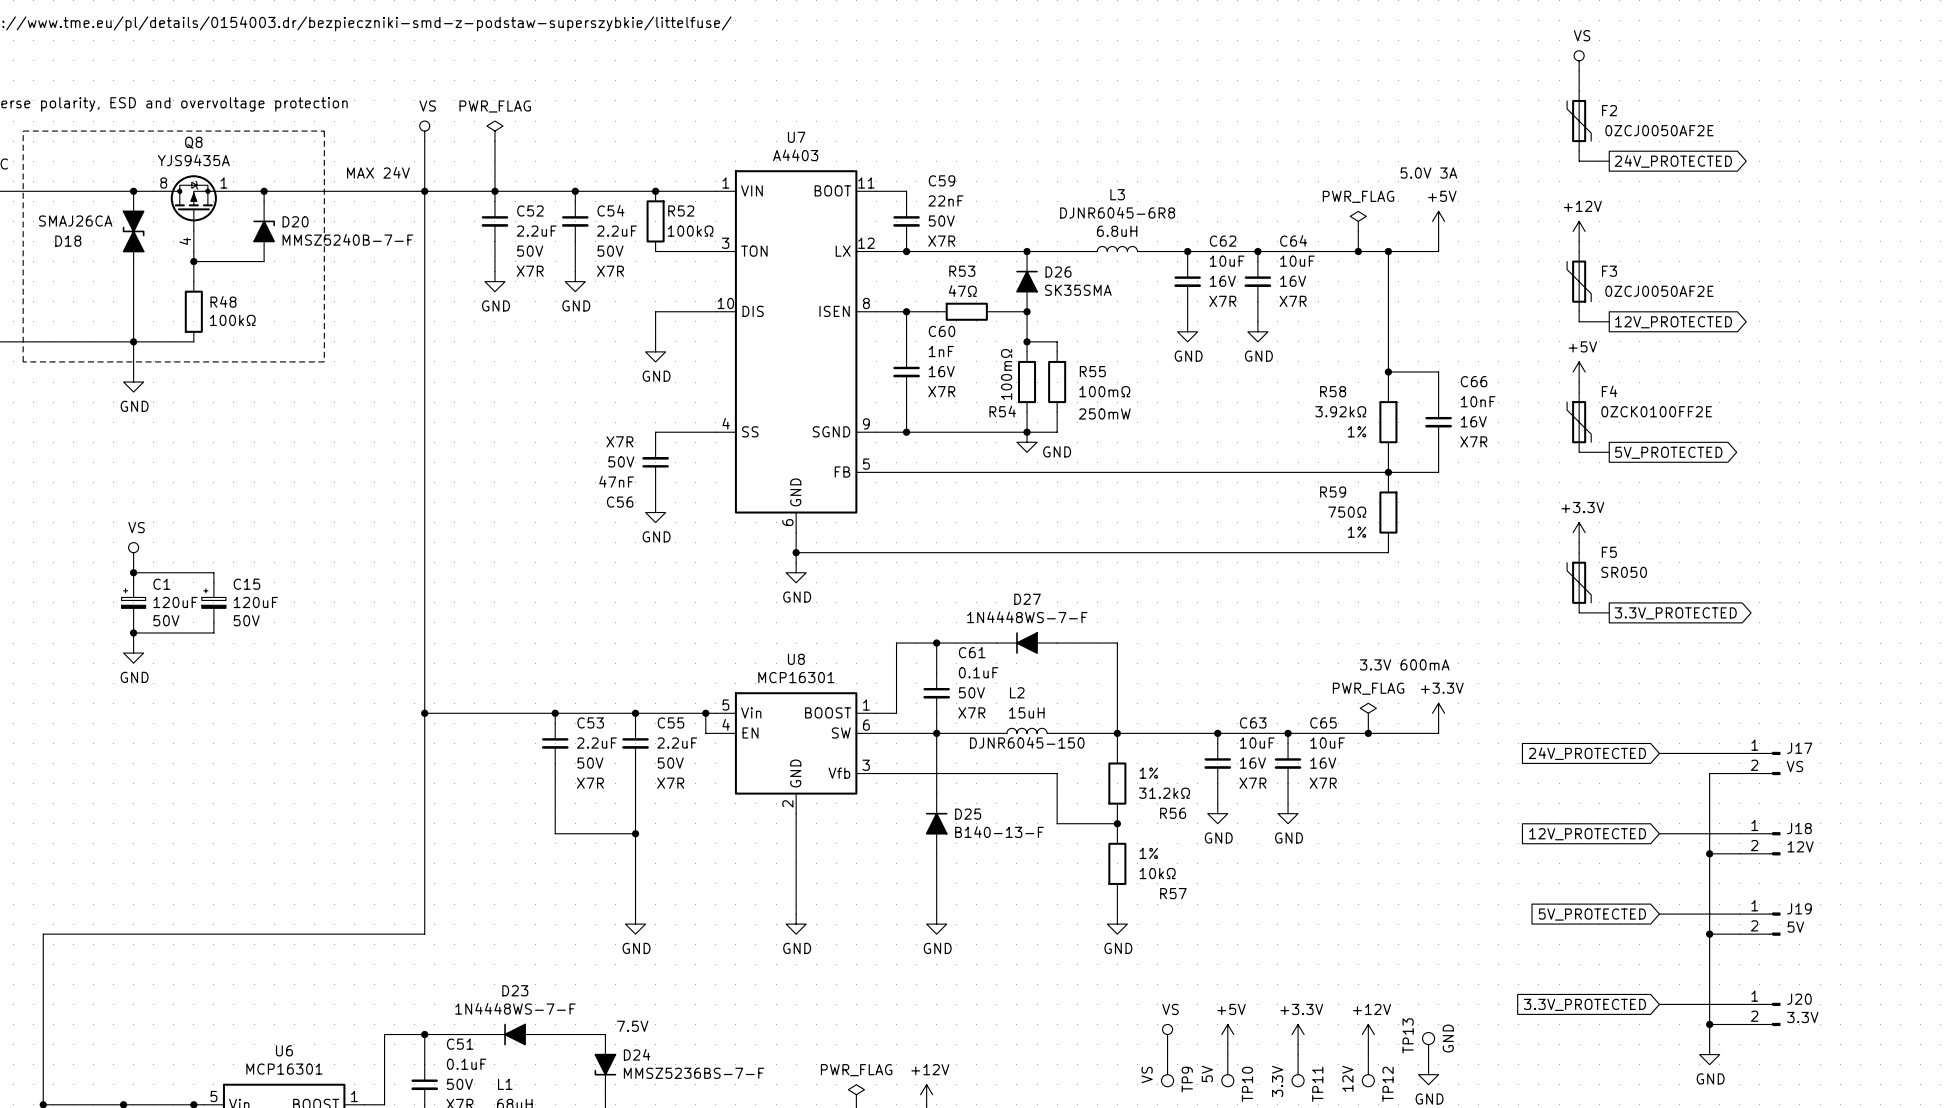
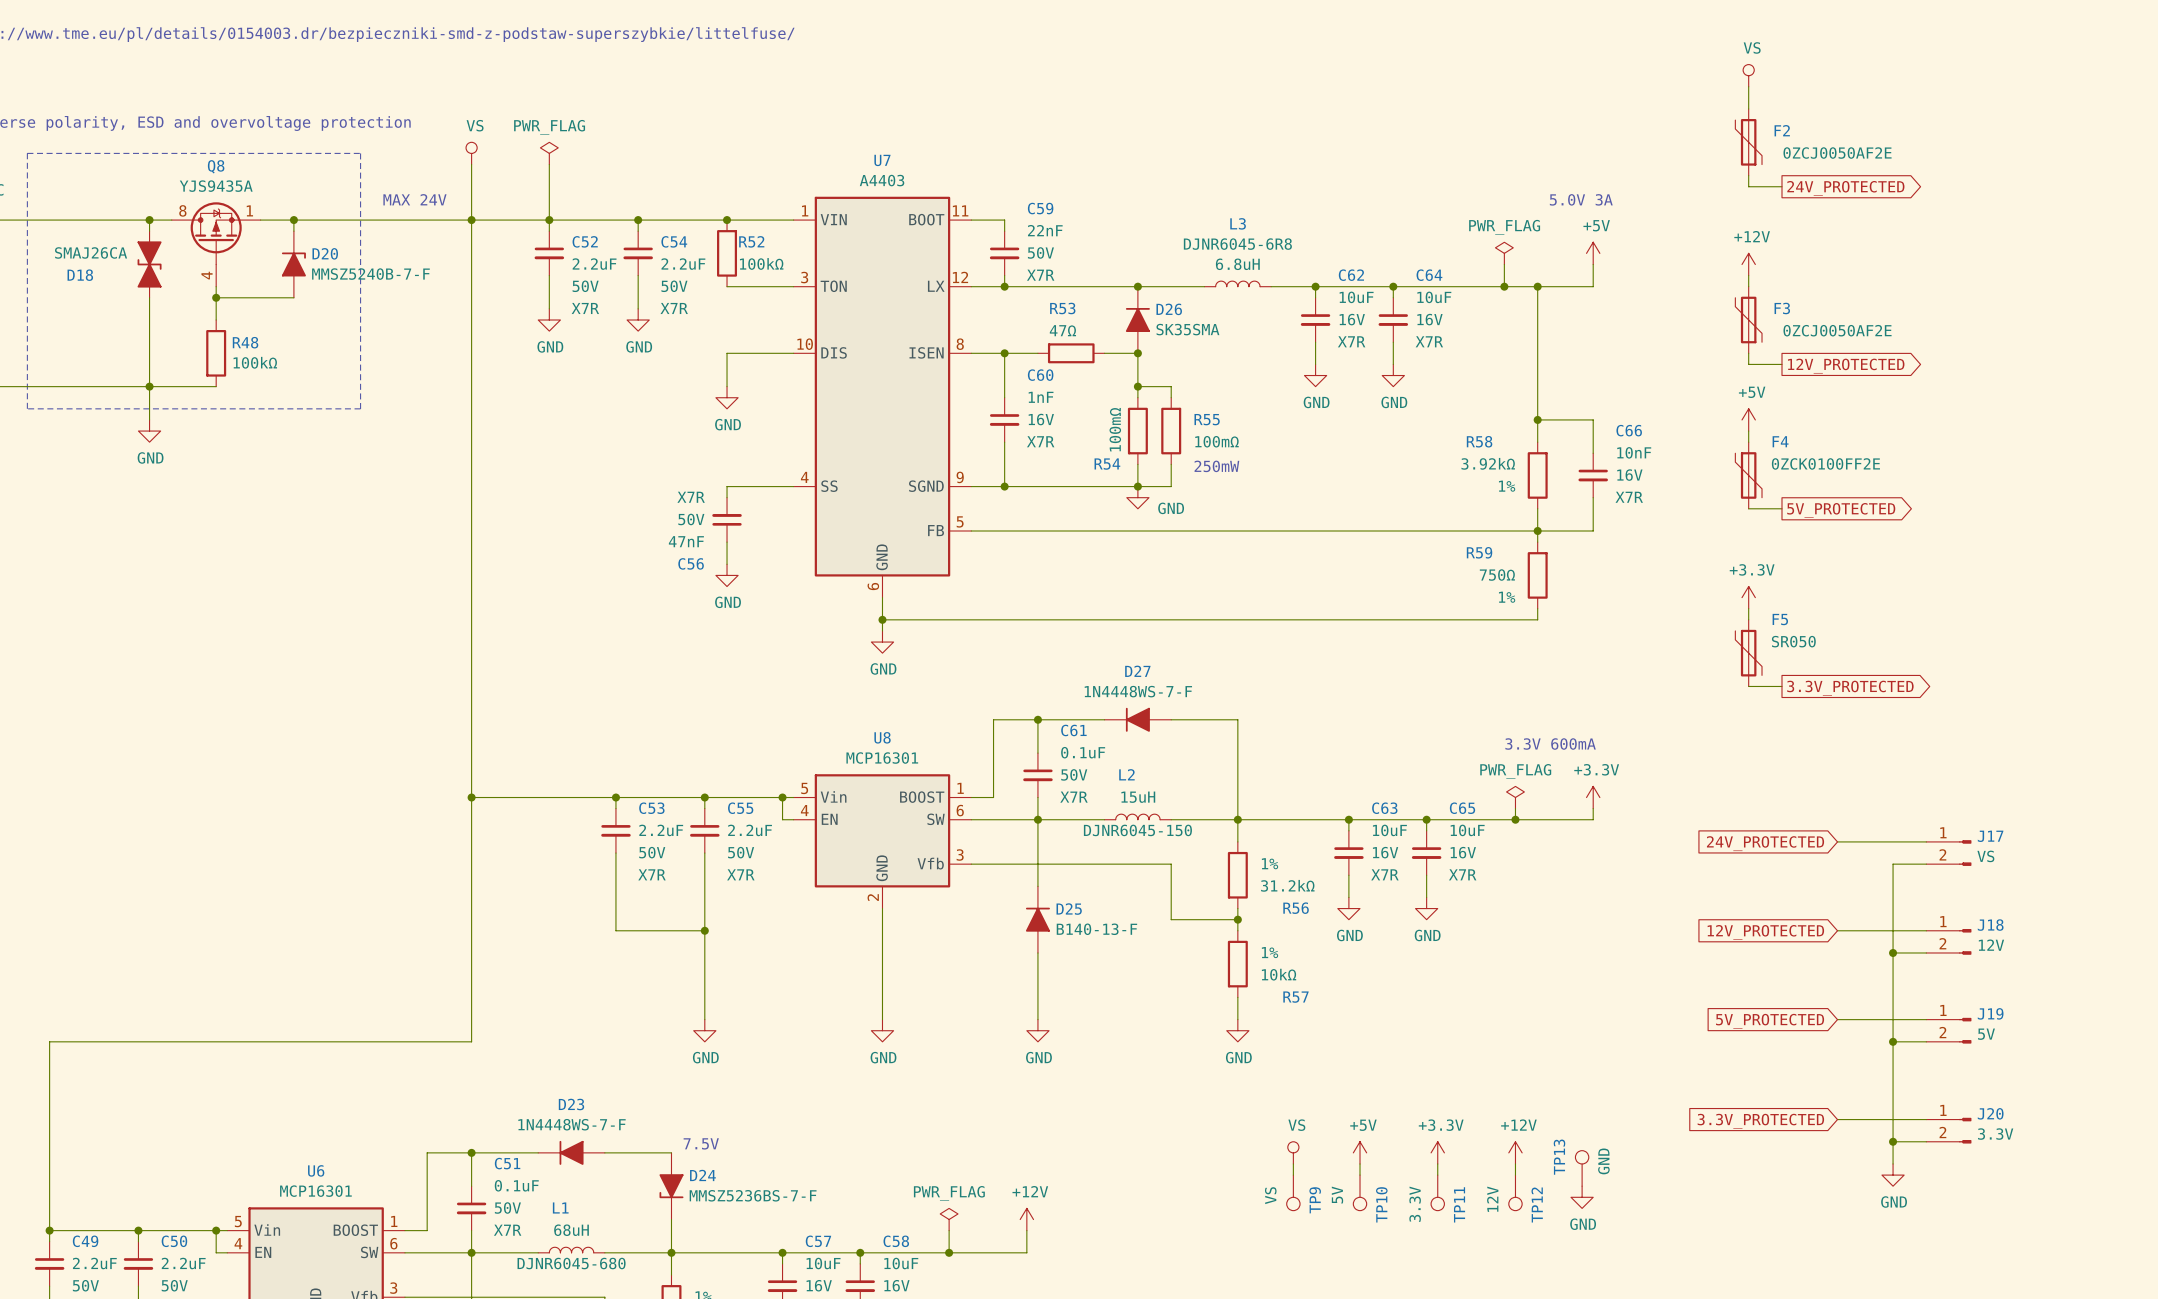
power symbol: VS (133, 552) -> none
wire: (133, 562) (133, 582) -> none
wire: (133, 572) (213, 572) (213, 582) -> none
junction: (133, 572) -> none
C1: 120uF (133, 602) -> none
C15: 120uF (213, 602) -> none
wire: (133, 622) (133, 643) -> none
wire: (213, 622) (213, 632) (133, 632) -> none
junction: (133, 632) -> none
power symbol: GND (133, 653) -> none

